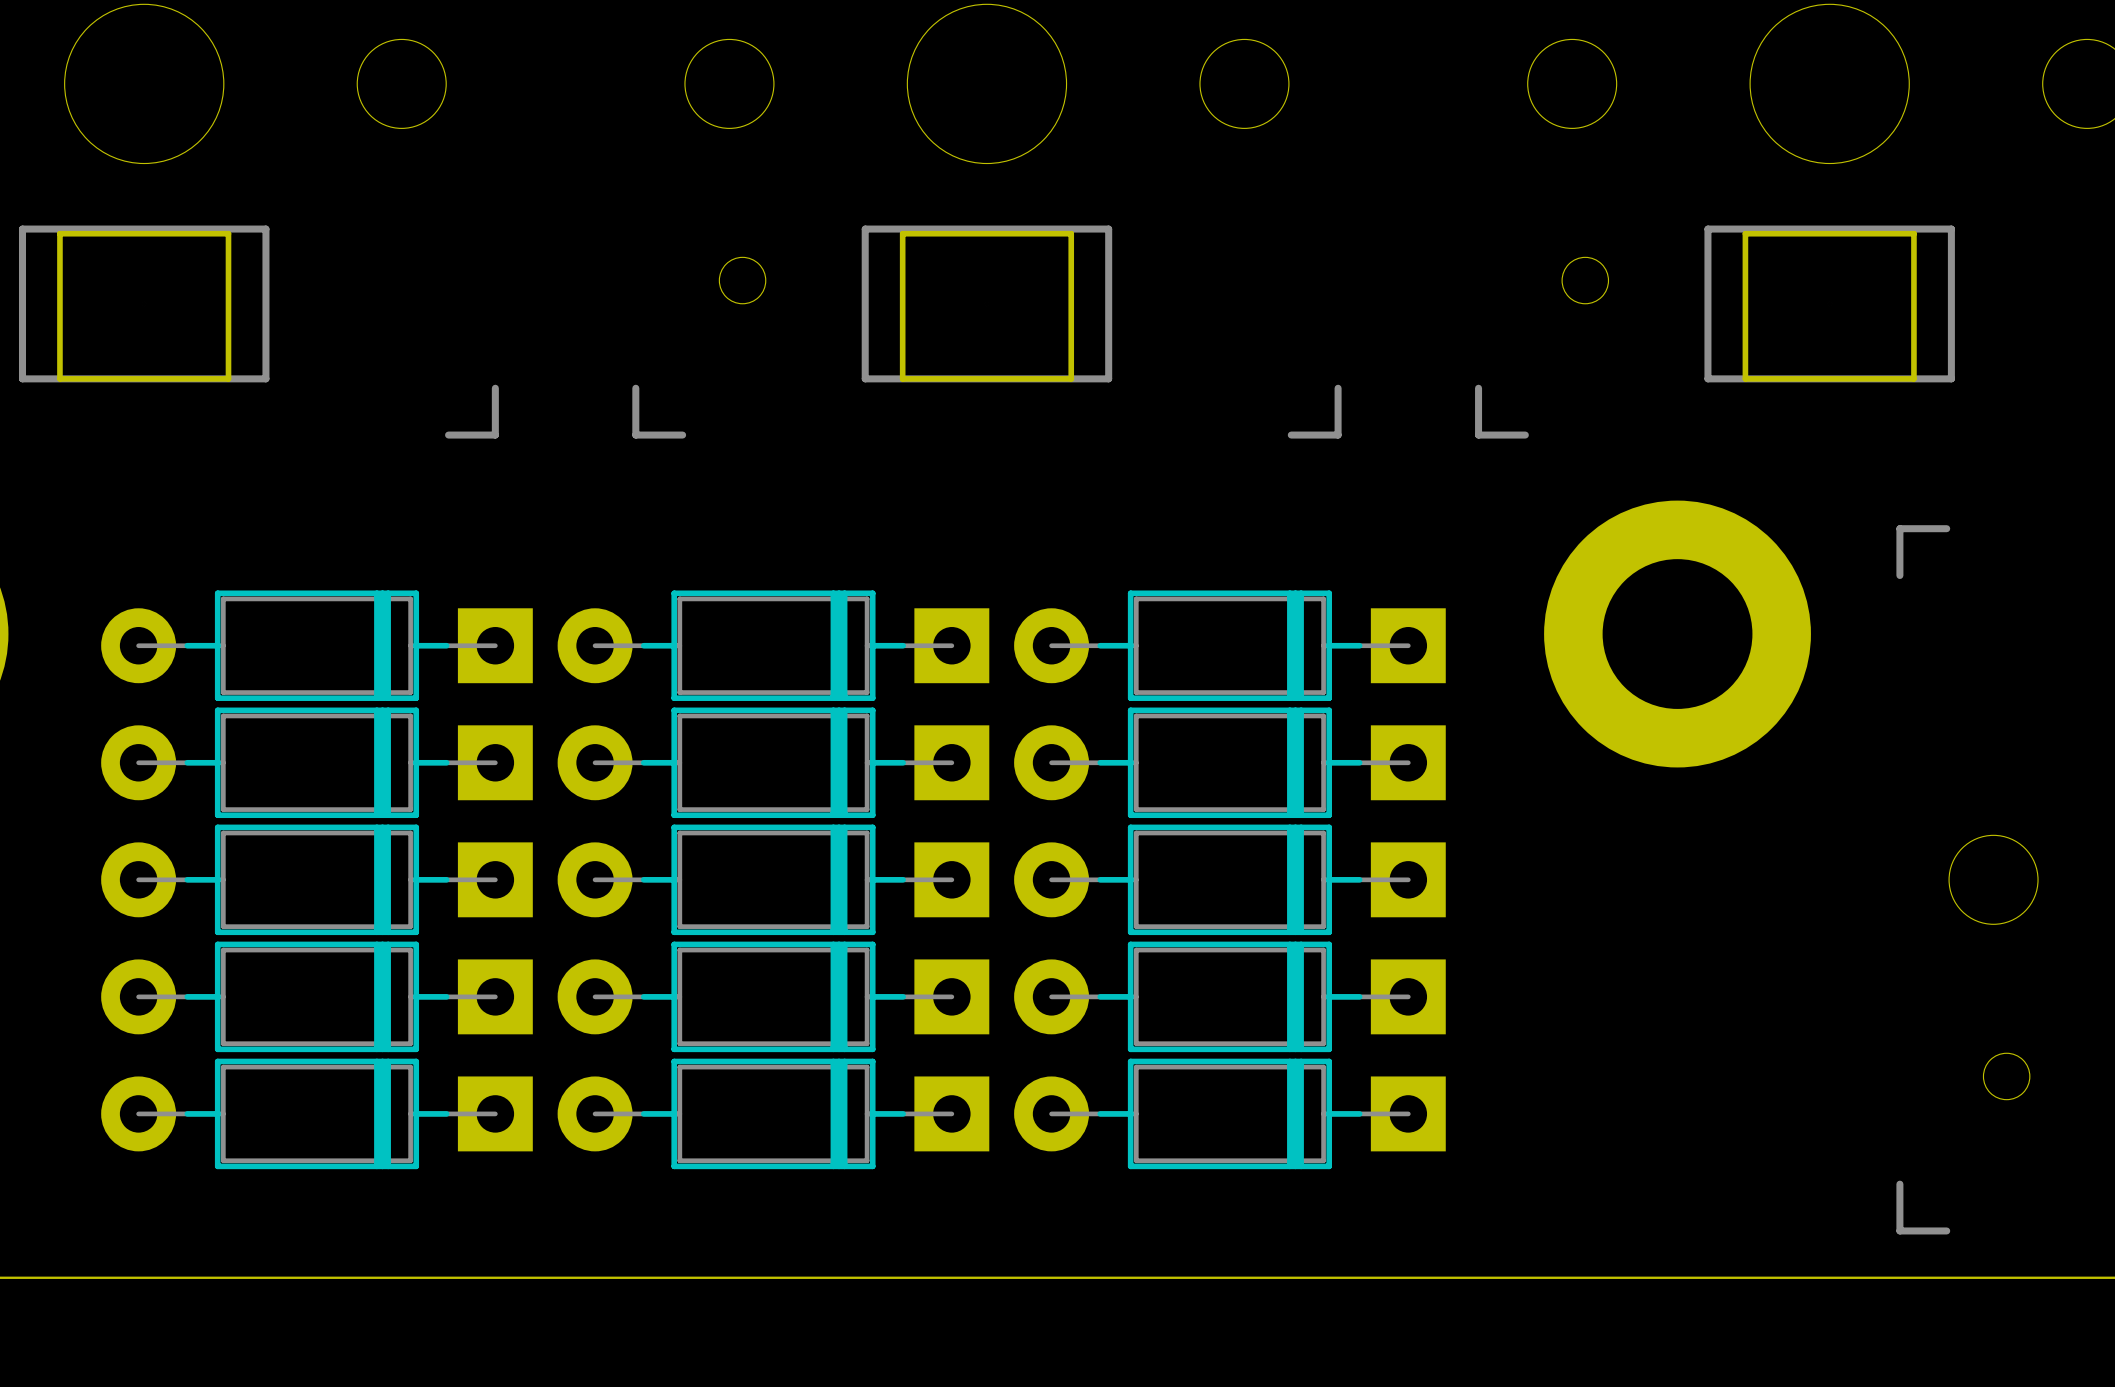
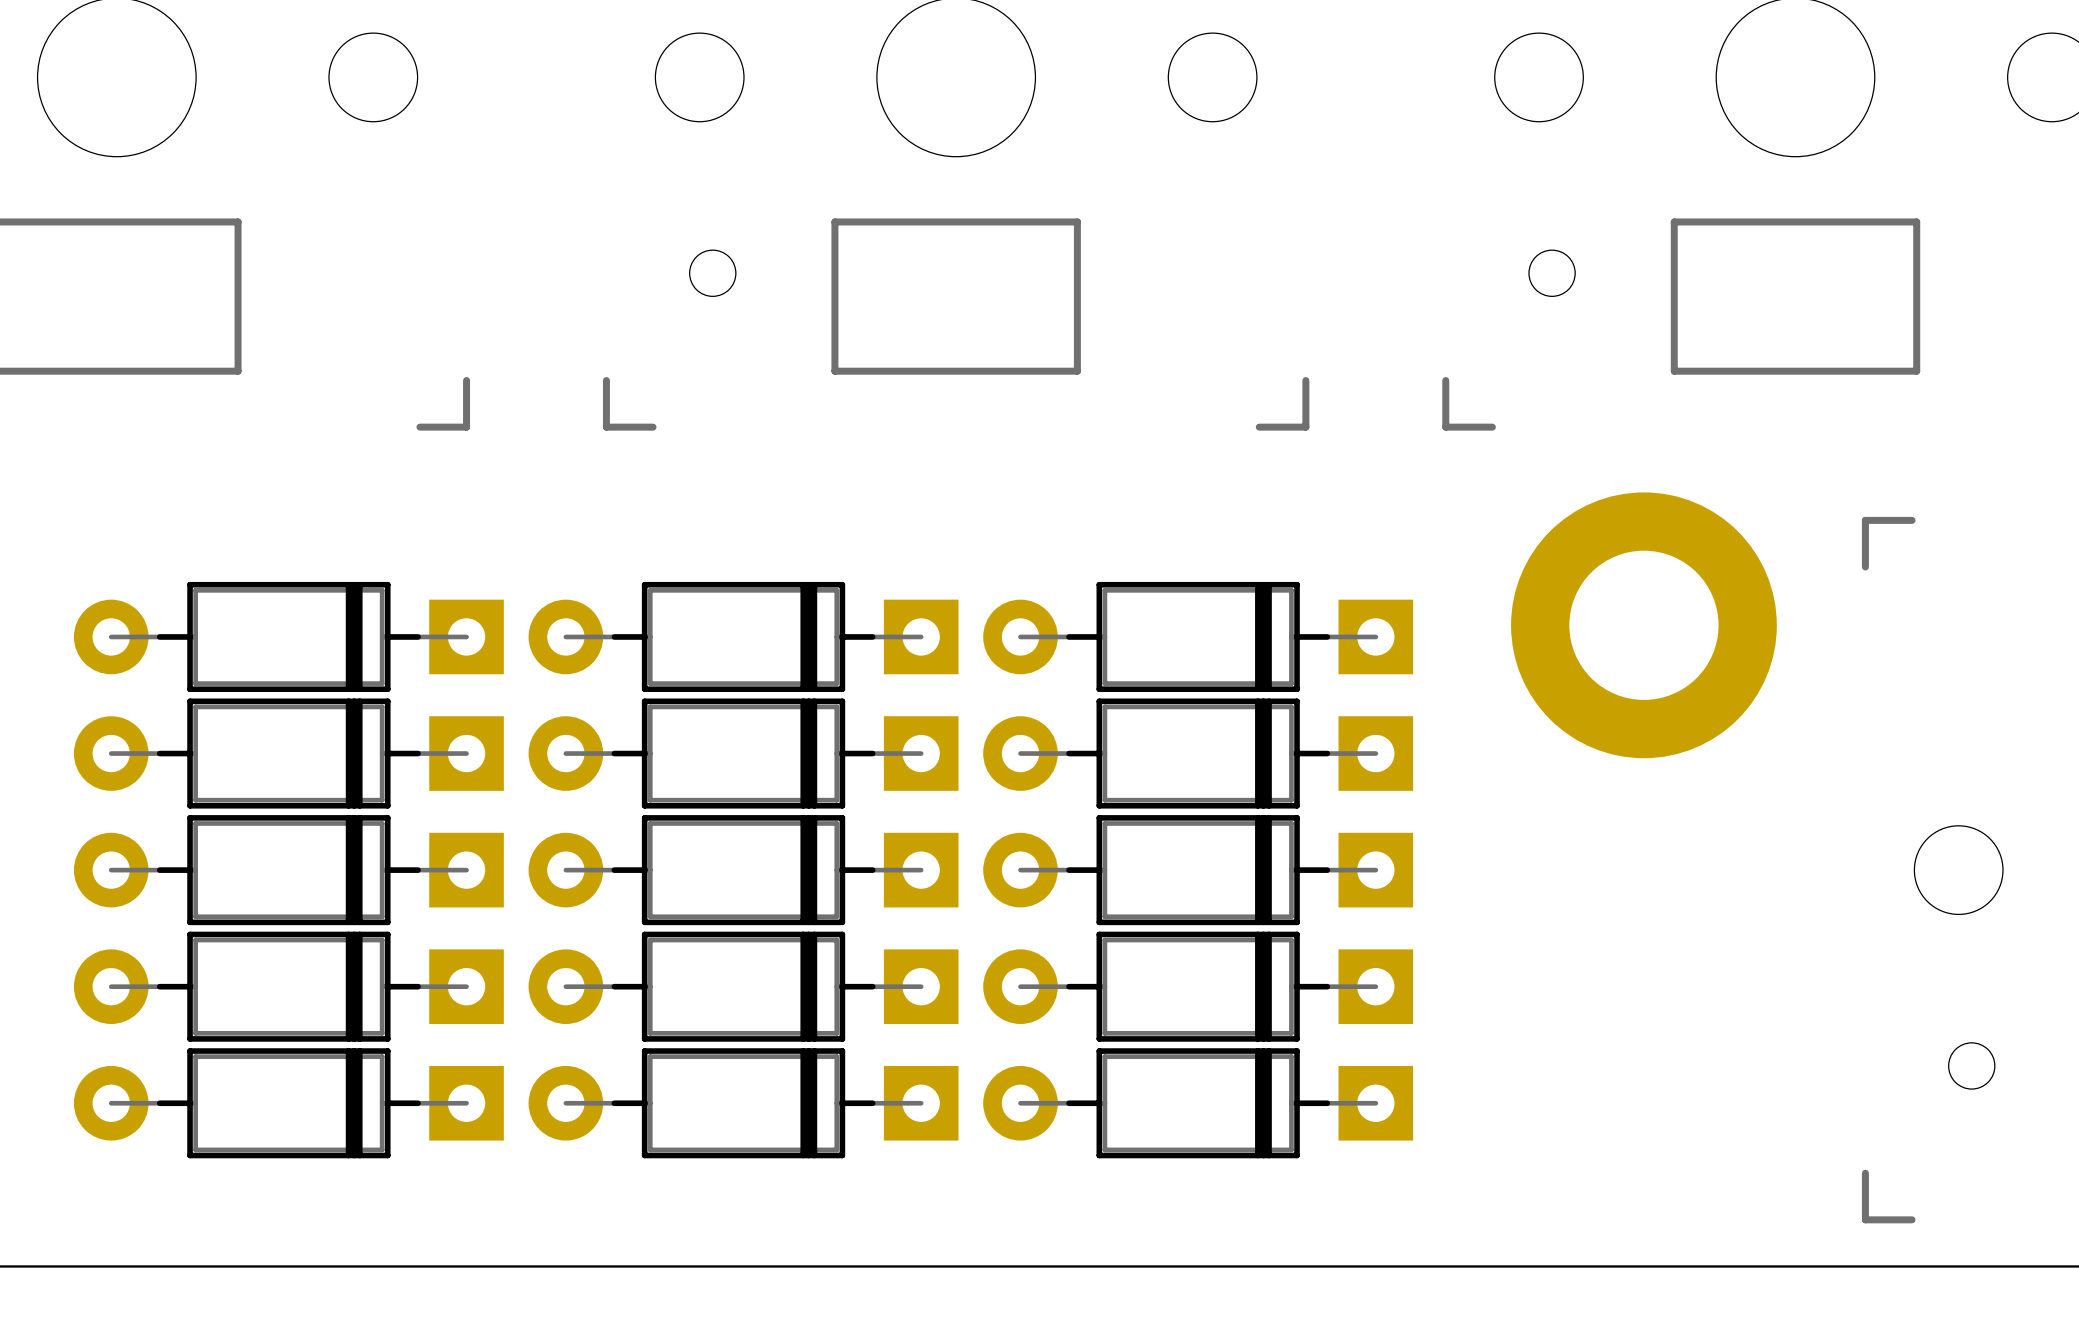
part: (144, 306) -> none
part: (986, 306) -> none
part: (1829, 306) -> none

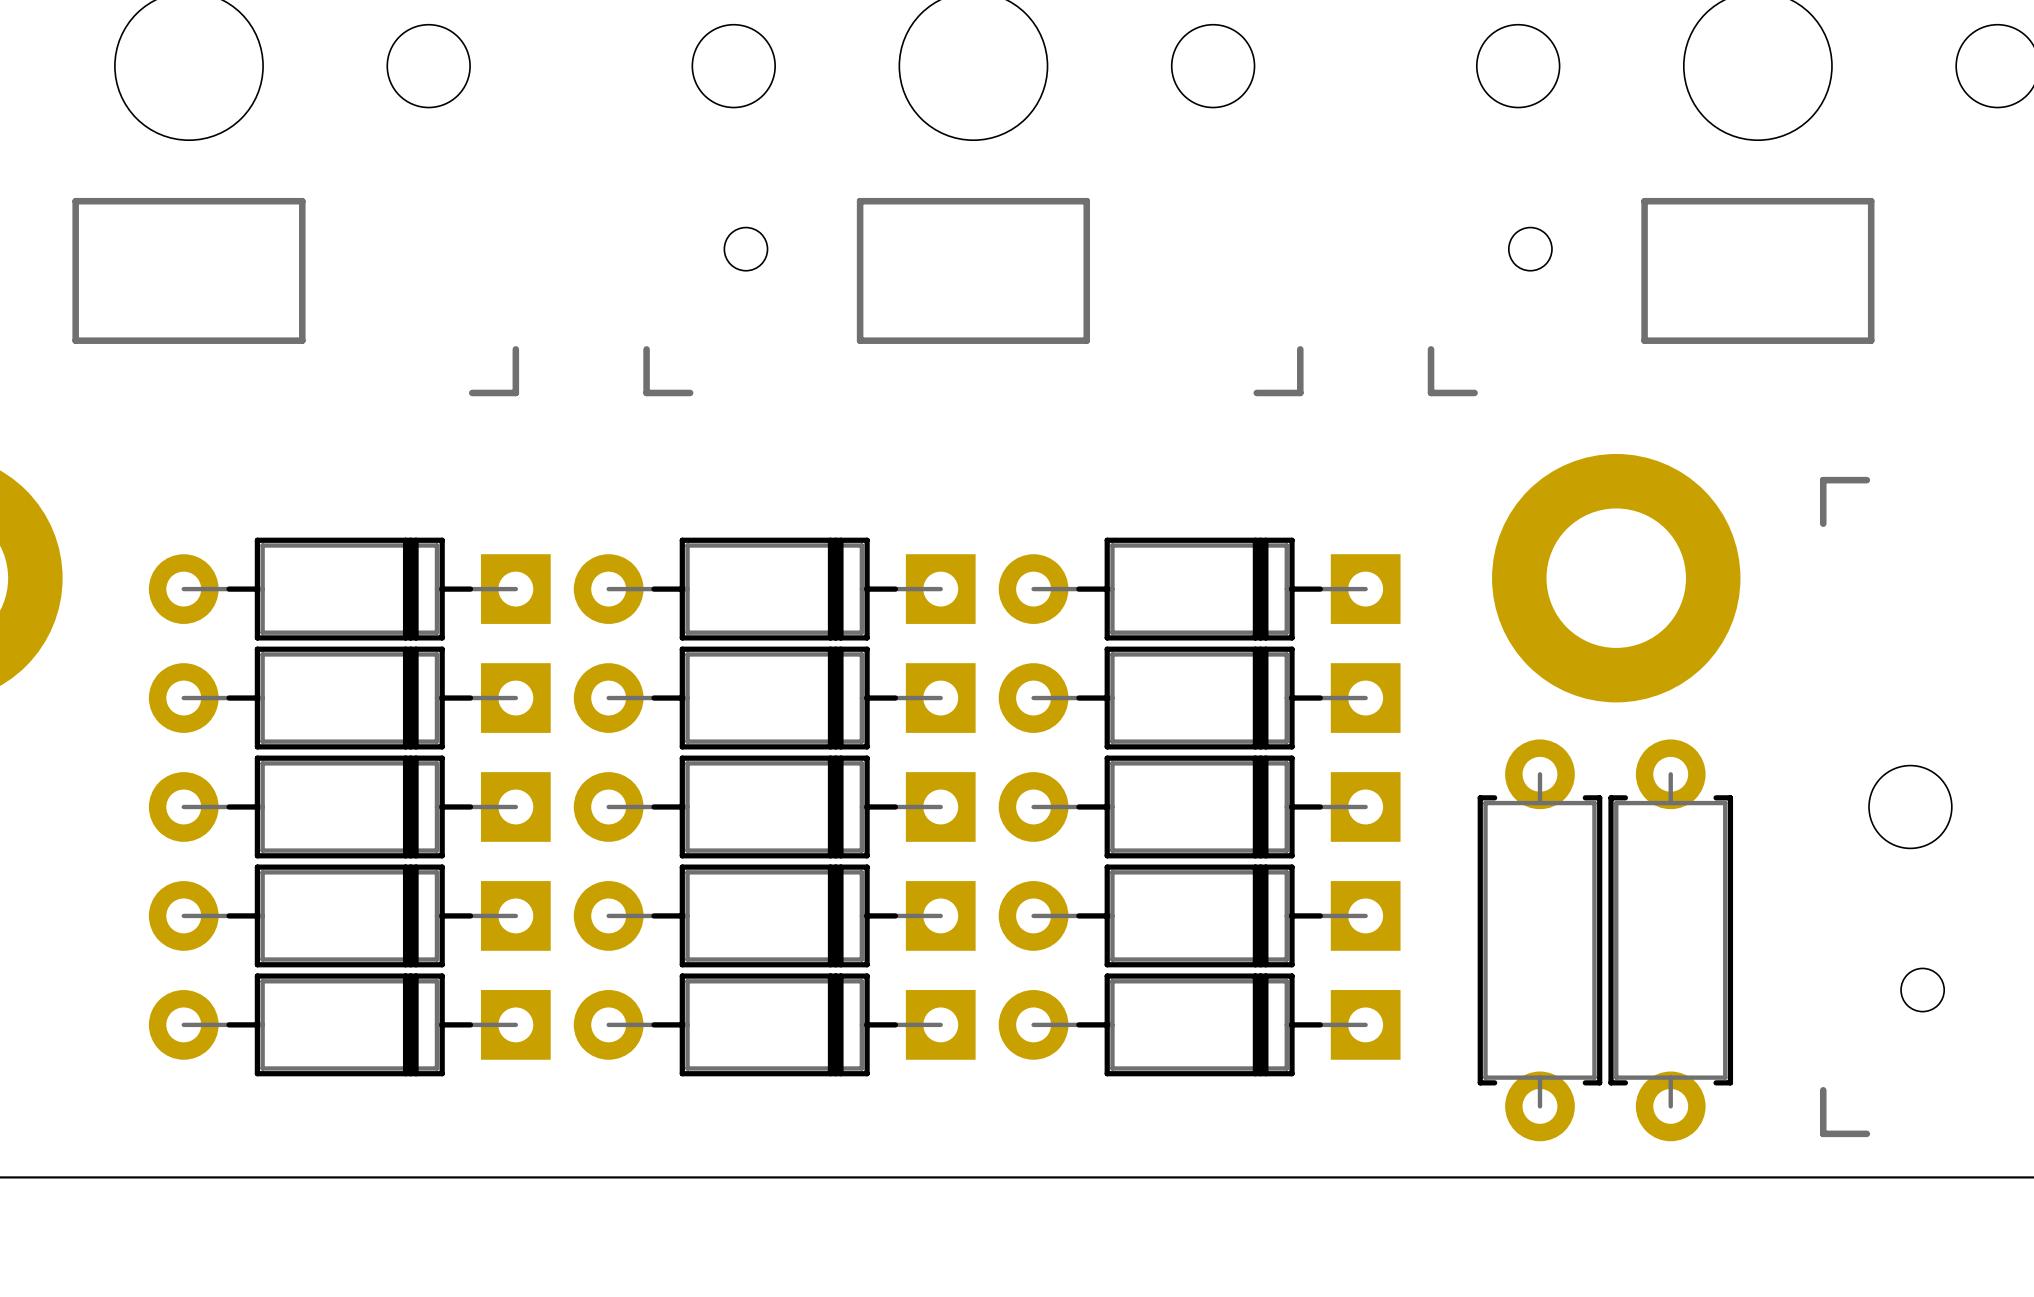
part: none -> (1539, 940)
part: none -> (1670, 940)

